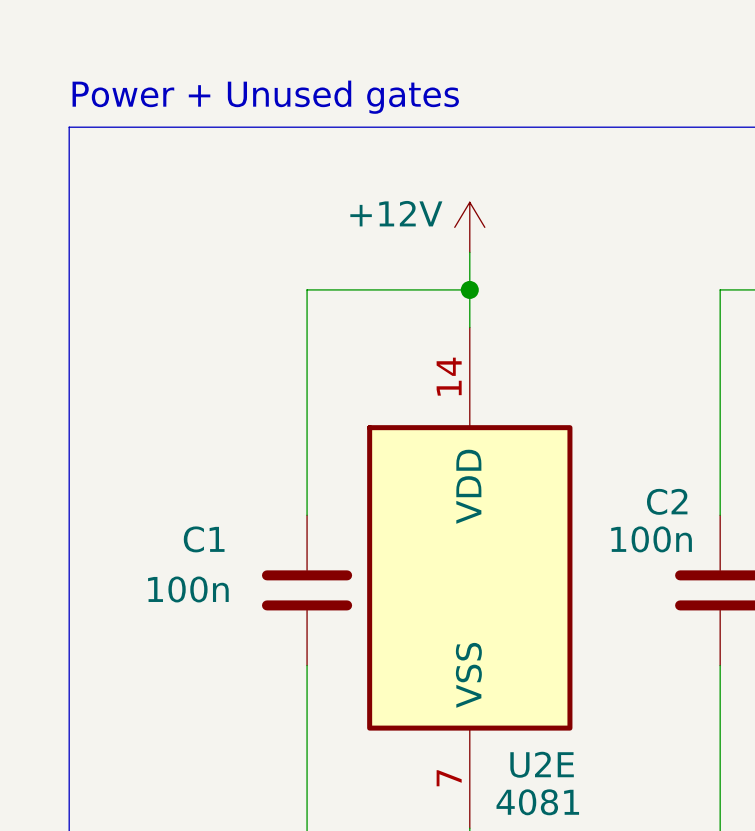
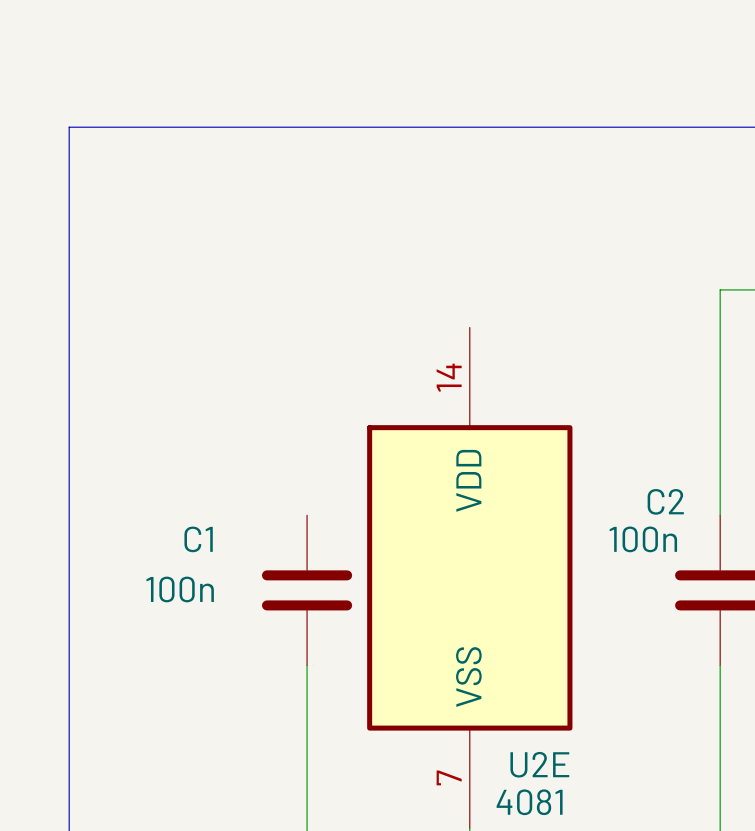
text: Power + Unused gates (265, 97) -> none
power symbol: +12V (469, 227) -> none
wire: (469, 252) (469, 327) -> none
wire: (469, 289) (307, 289) (307, 515) -> none
junction: (469, 289) -> none

